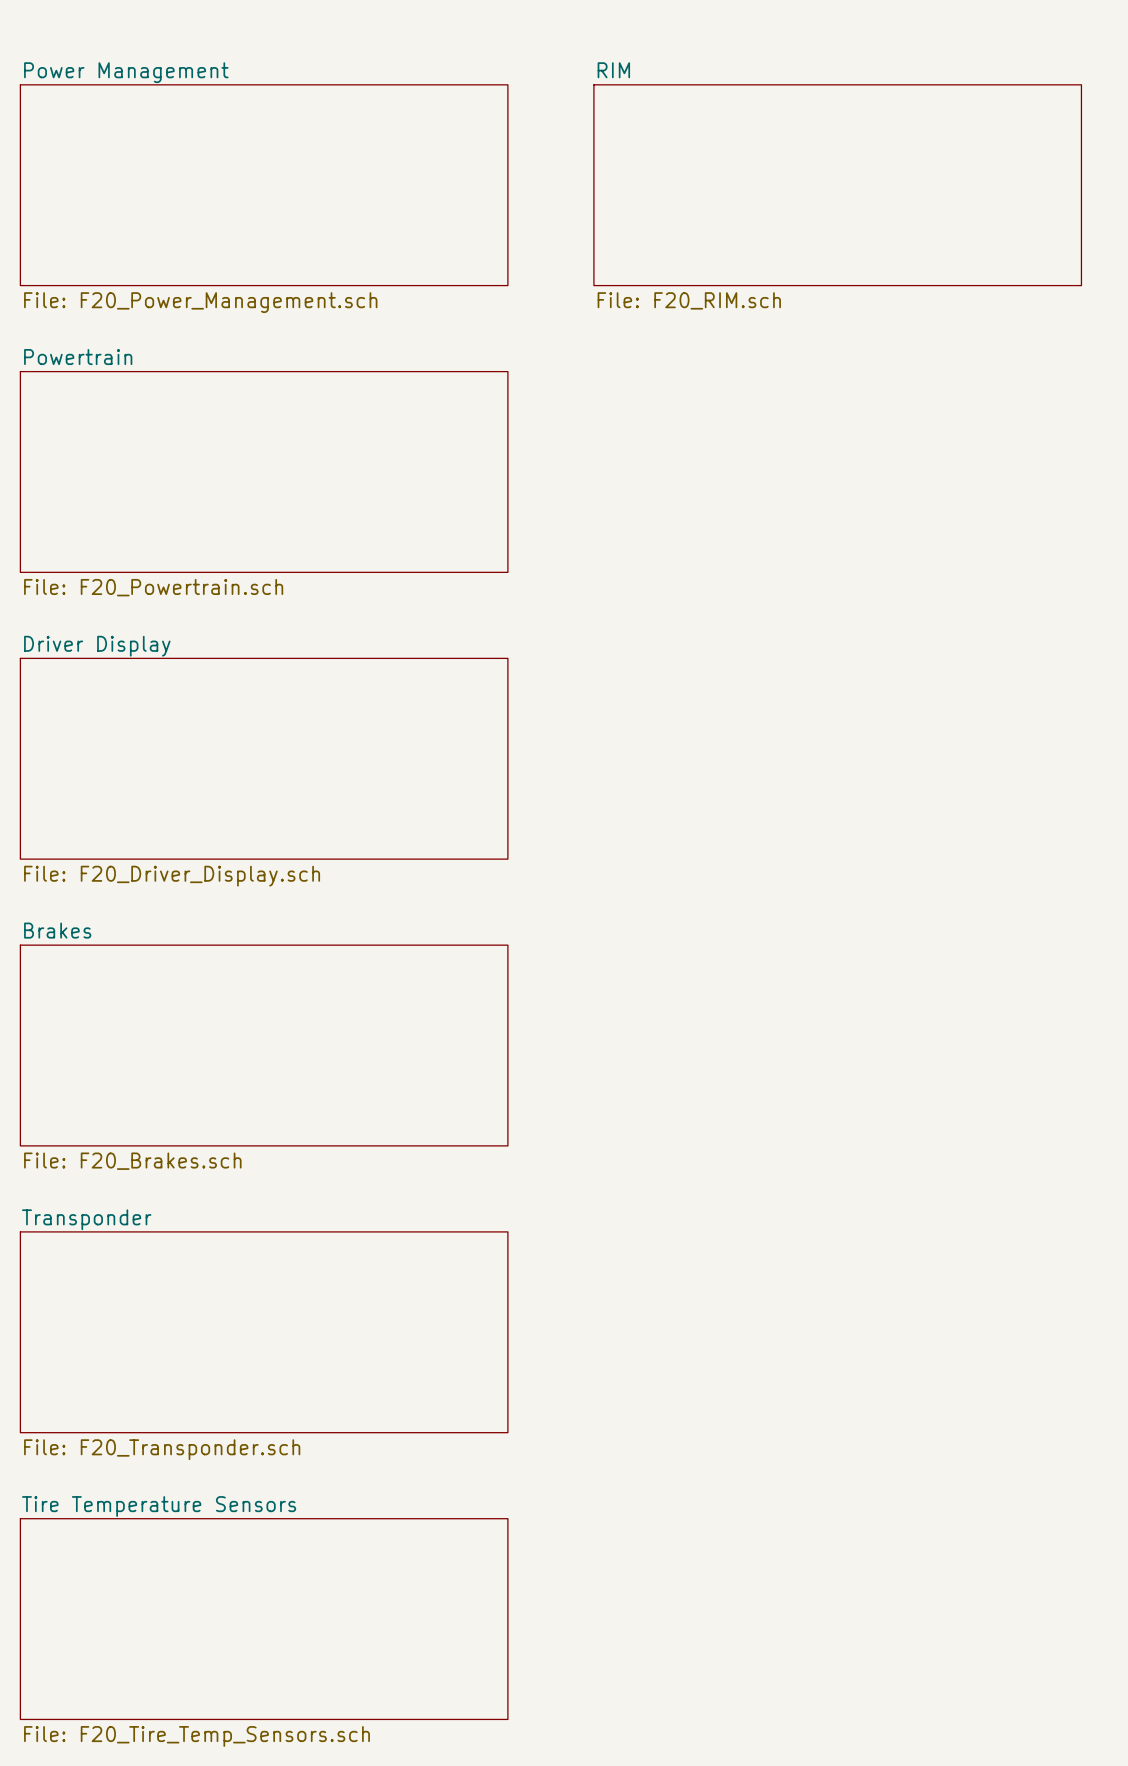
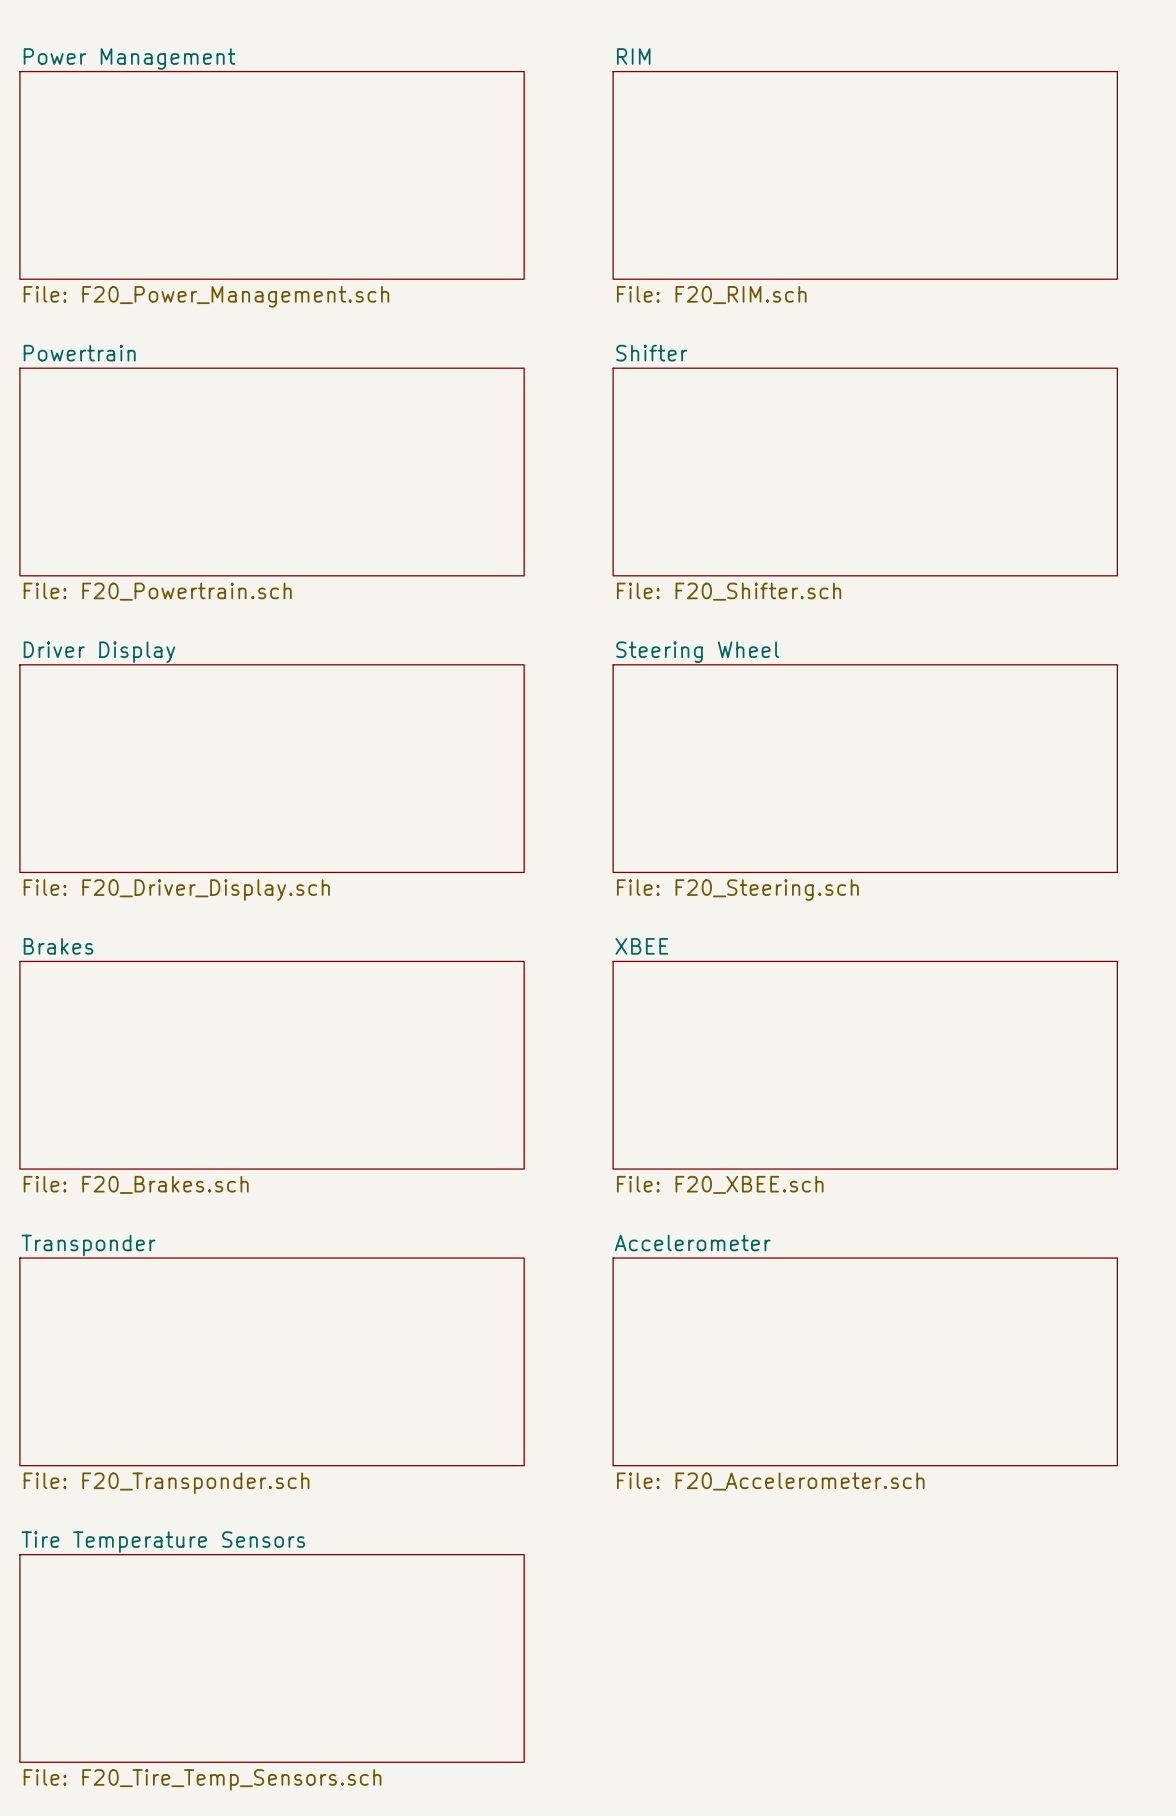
sheet Shifter: none -> File: F20_Shifter.sch (865, 472)
sheet Steering Wheel: none -> File: F20_Steering.sch (865, 768)
sheet XBEE: none -> File: F20_XBEE.sch (865, 1065)
sheet Accelerometer: none -> File: F20_Accelerometer.sch (865, 1361)

